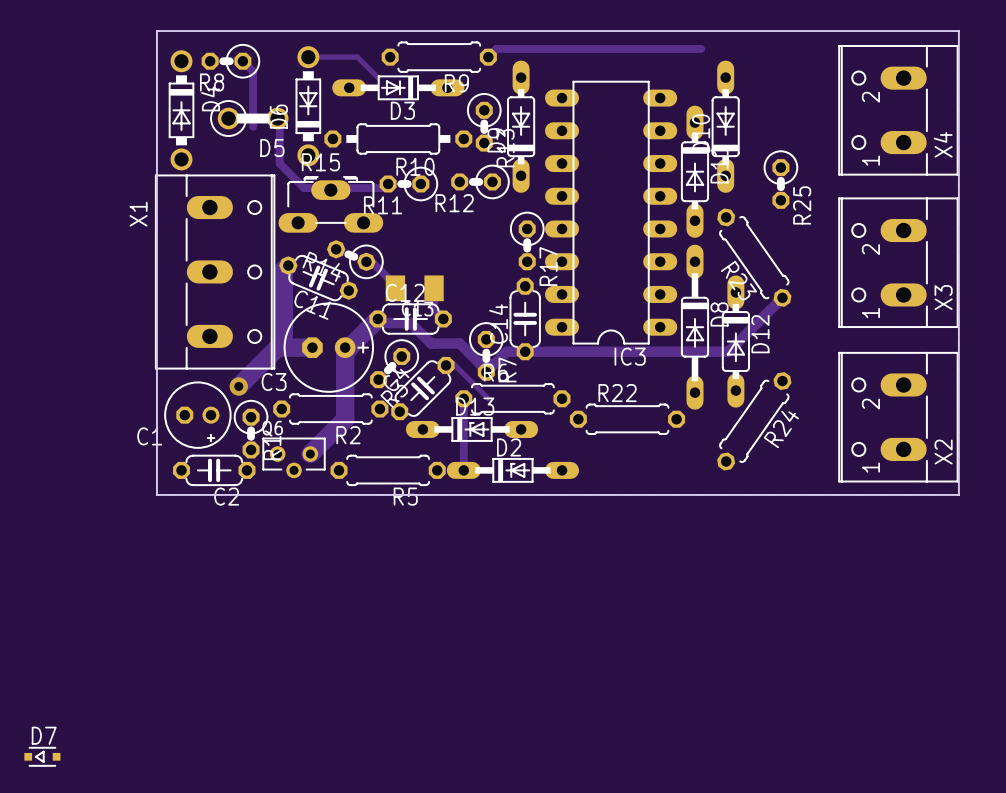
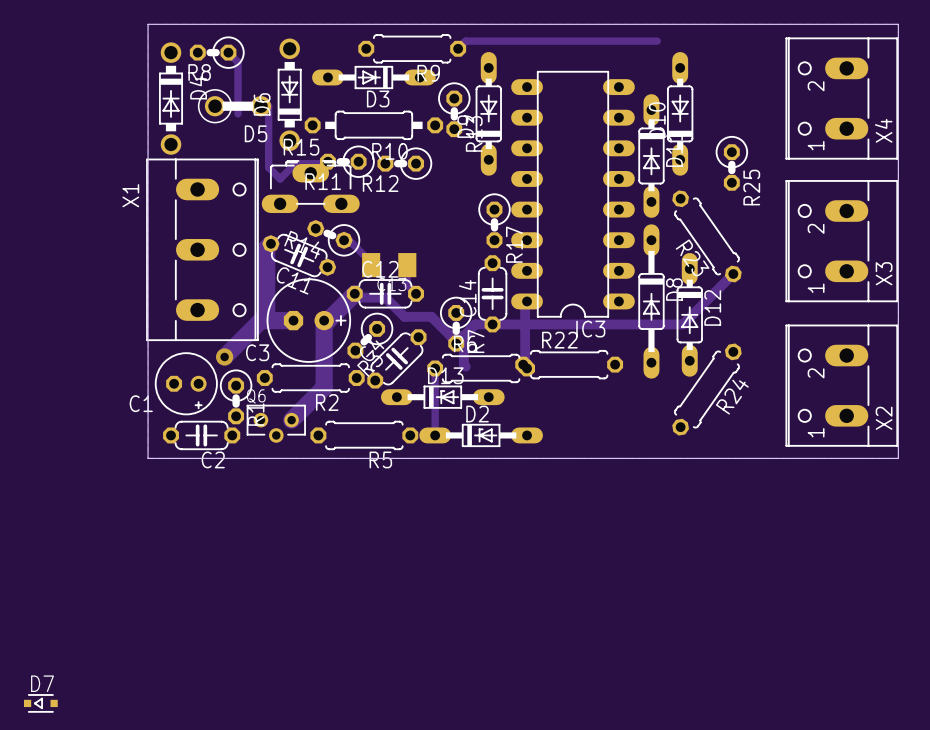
track: (308, 57) (357, 57) (377, 77) -> none
track: (277, 118) (279, 118) (279, 163) (304, 188) (388, 188) (388, 183) -> none
track: none -> (264, 106) (268, 106) (268, 167) (280, 178) (295, 163) (326, 163) (327, 161)
R12 position: (480, 181) -> (404, 163)
R11 position: (408, 183) -> (347, 161)
track: none -> (527, 301) (525, 301) (525, 362) (523, 364)
track: (451, 364) (488, 398) -> none
track: none -> (463, 337) (463, 364) (465, 366)
R22 position: (627, 419) -> (569, 364)

